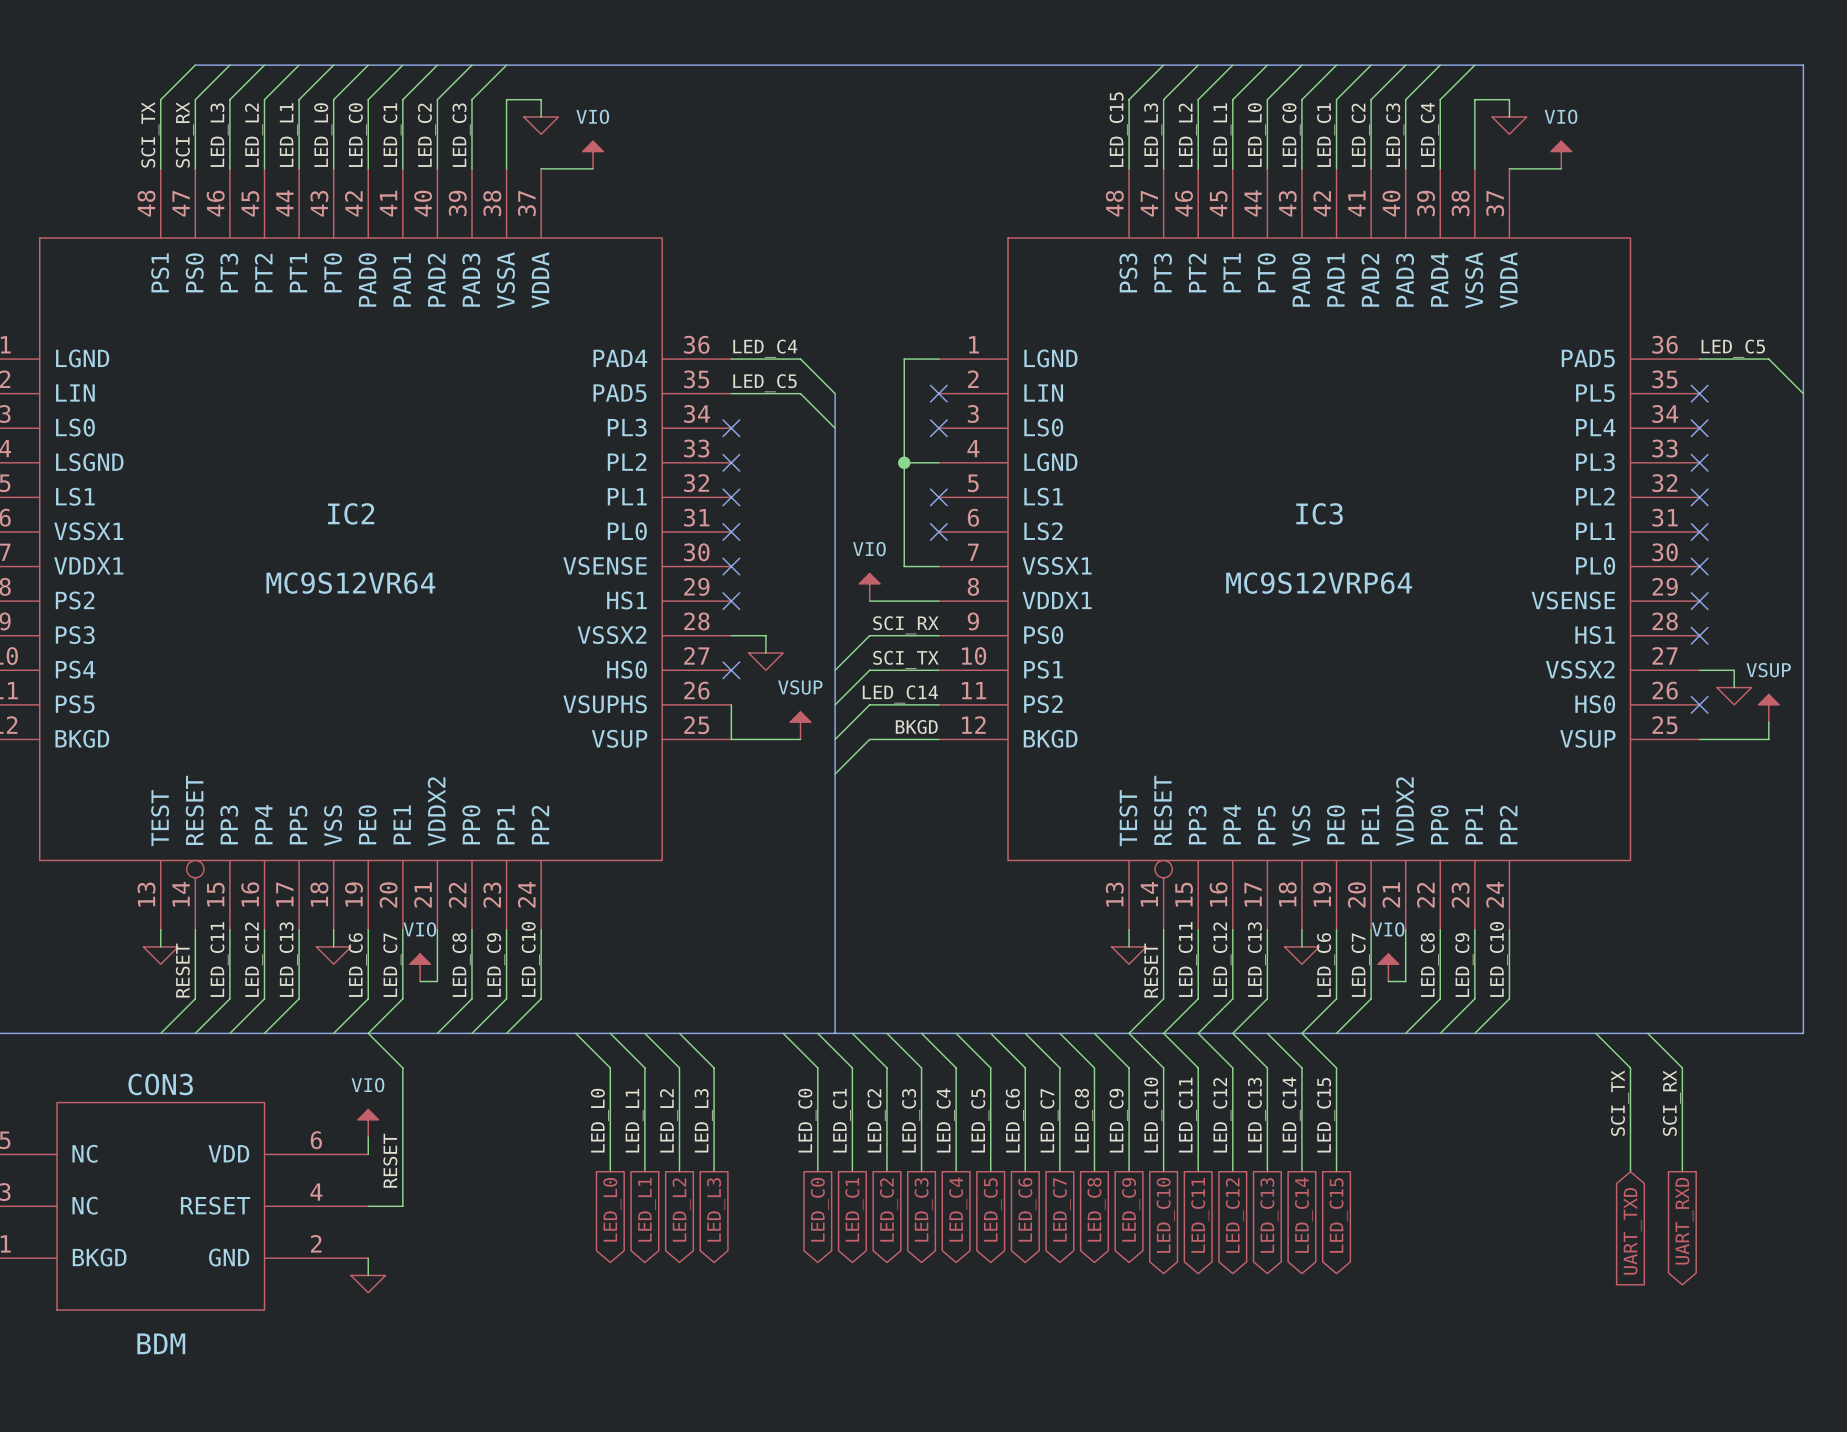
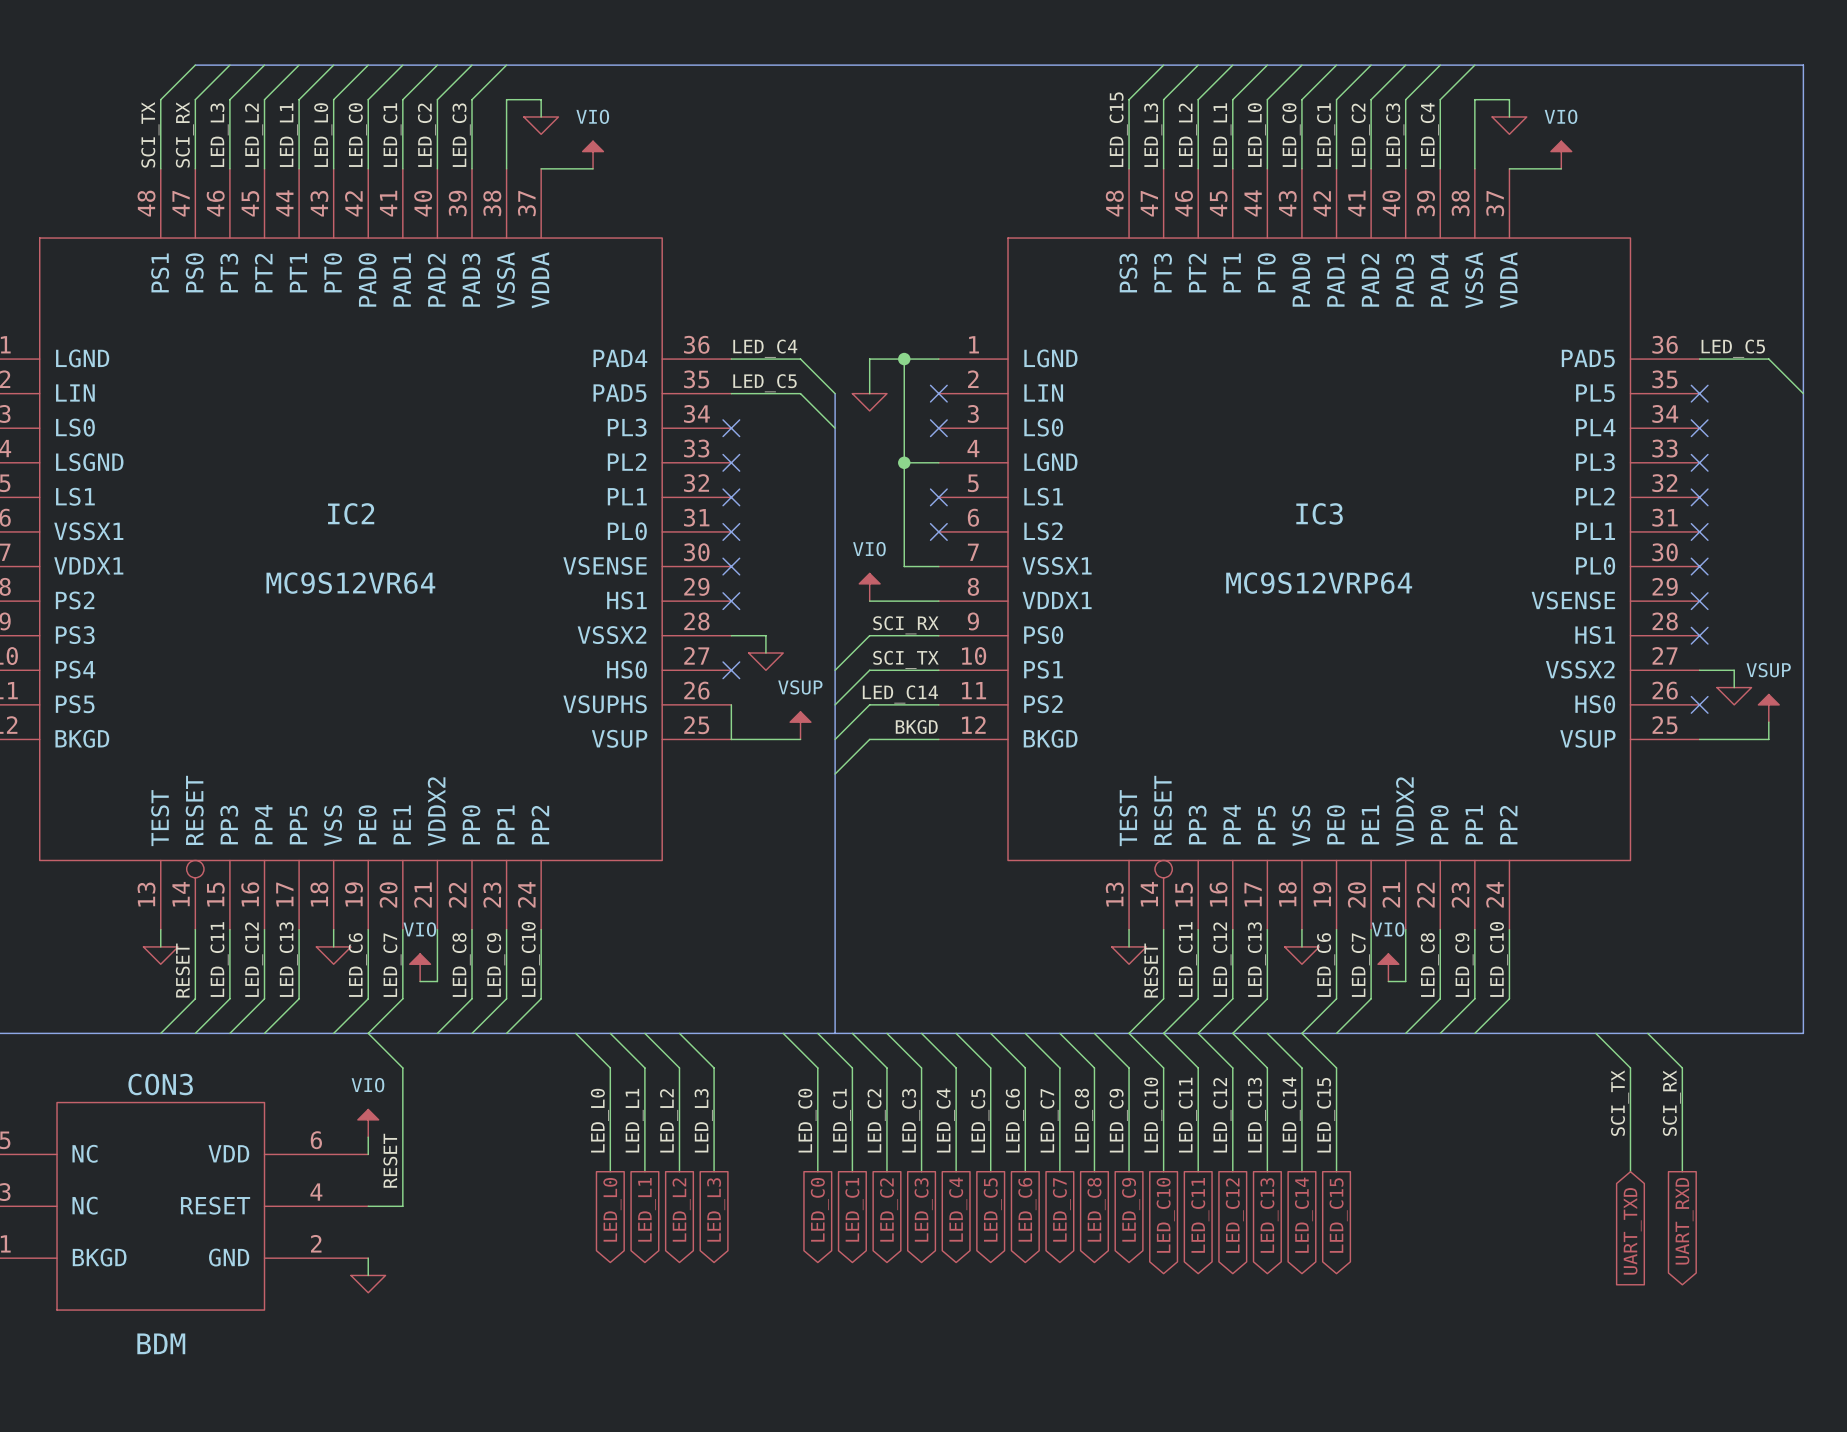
wire: none -> (904, 359) (869, 359) (869, 393)
junction: none -> (904, 359)
power symbol: none -> (869, 402)

